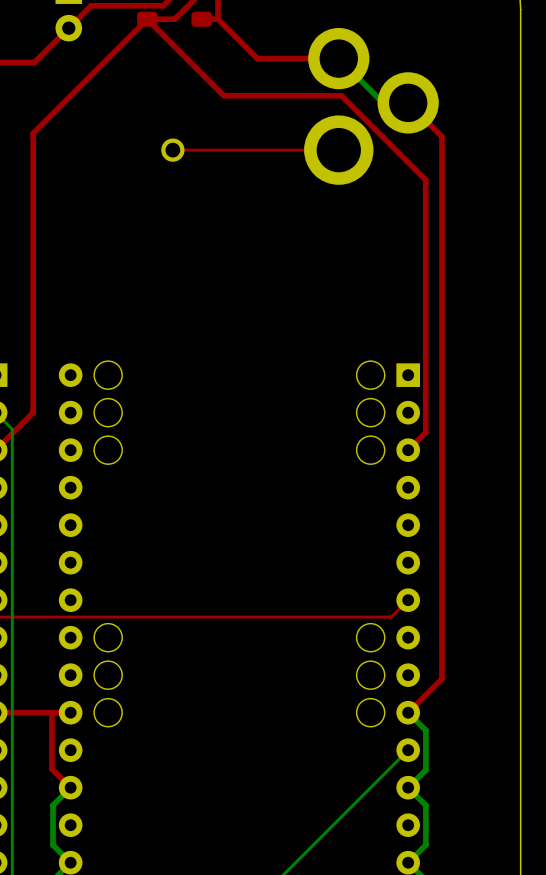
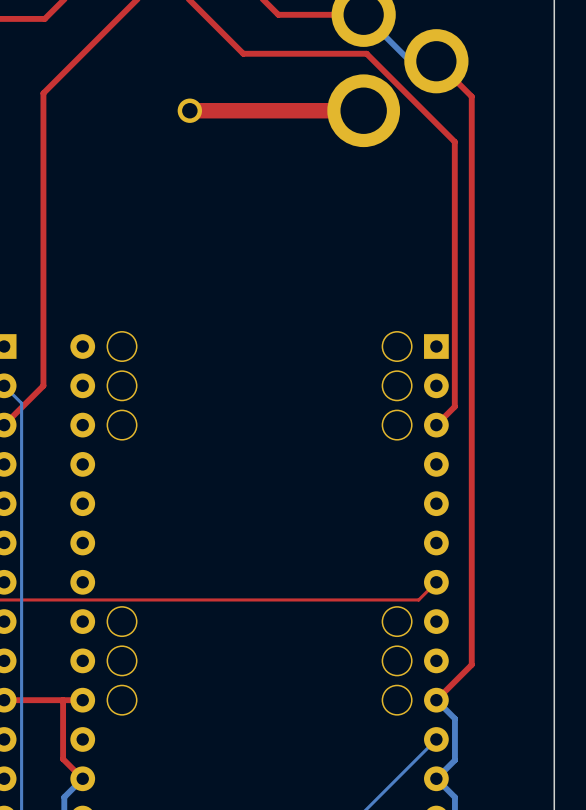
top track width: thin (338, 150) (172, 150) -> thick (363, 110) (189, 110)

